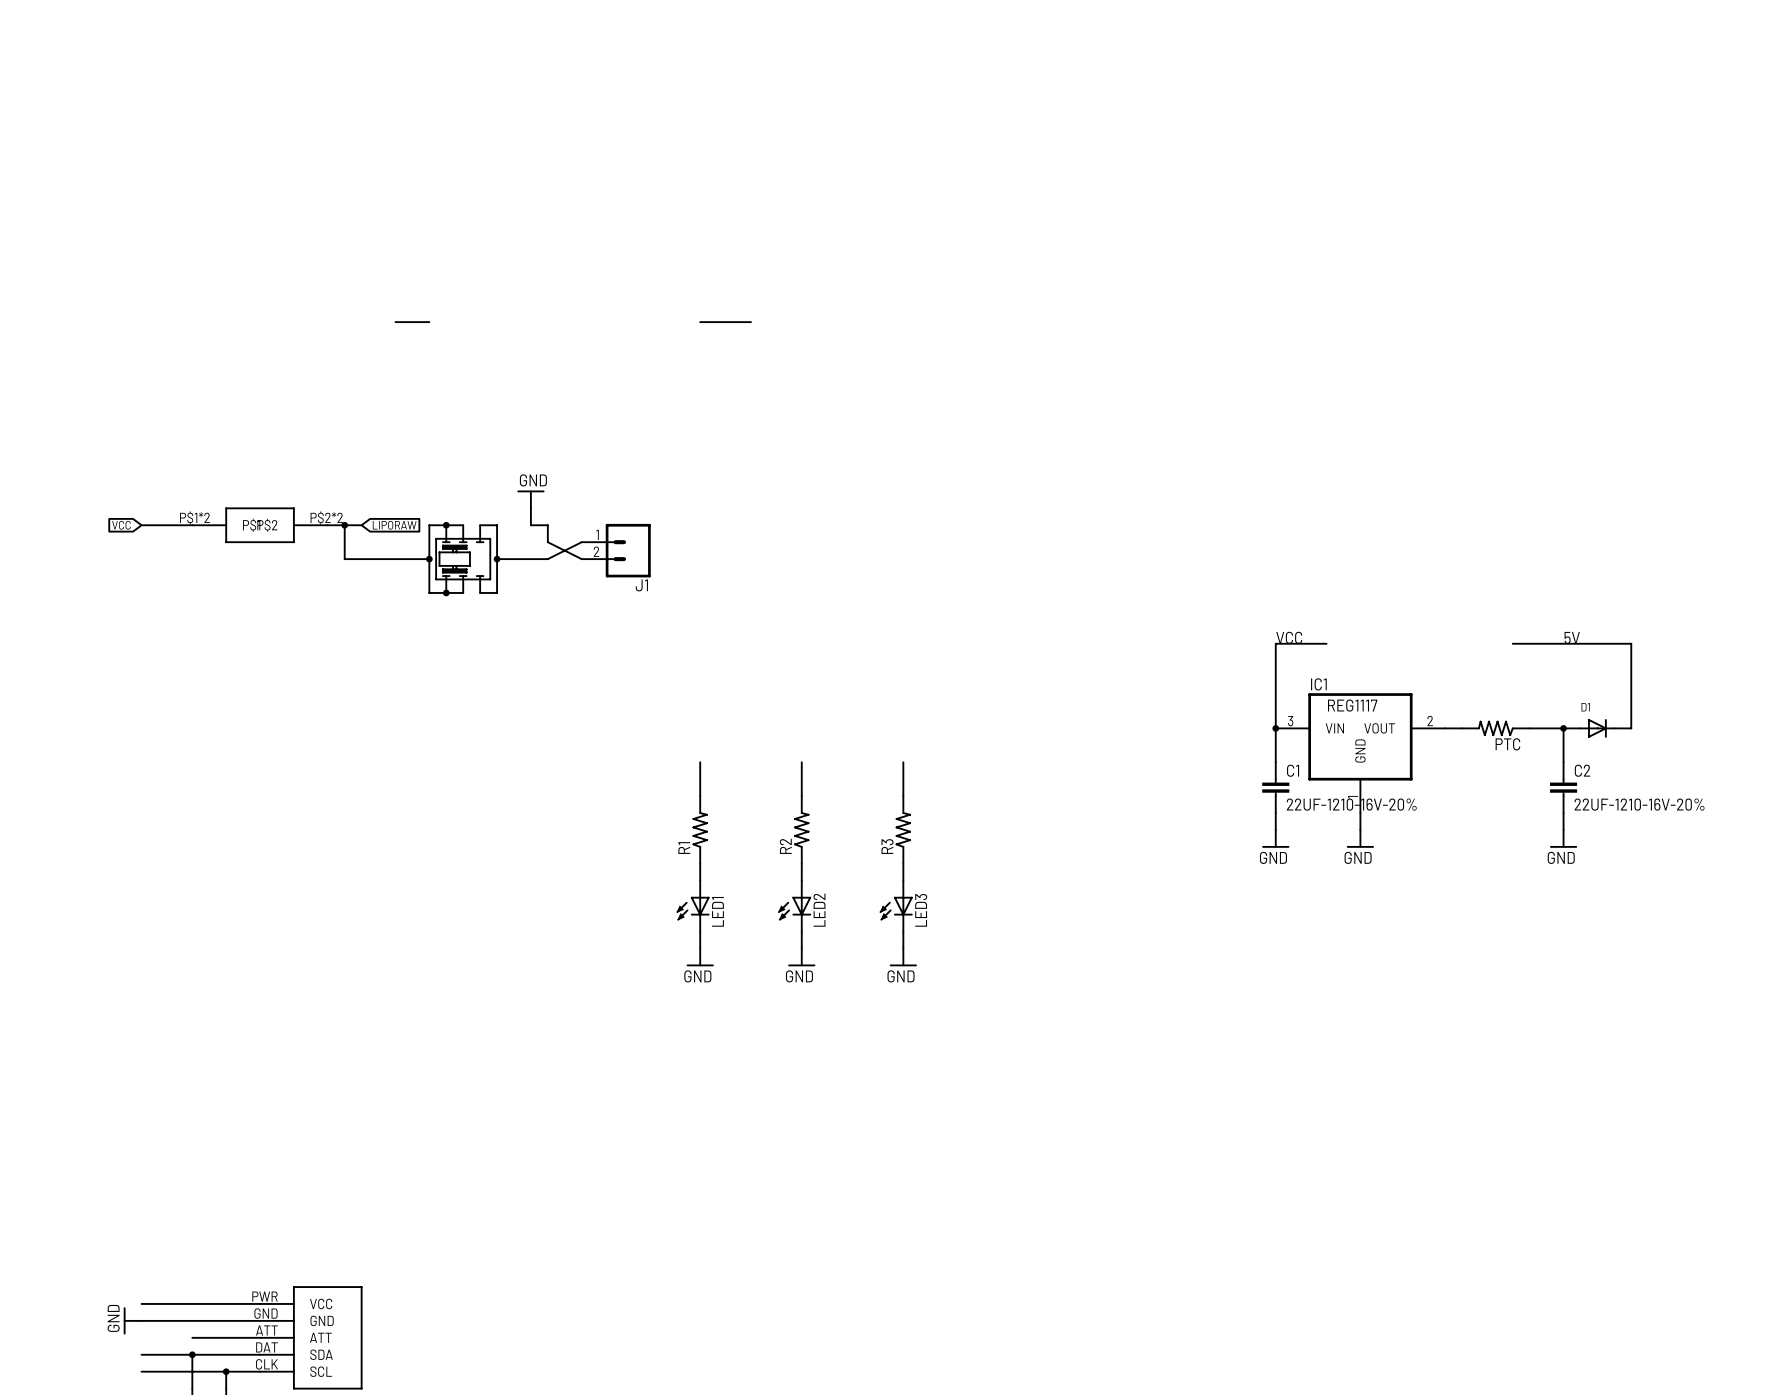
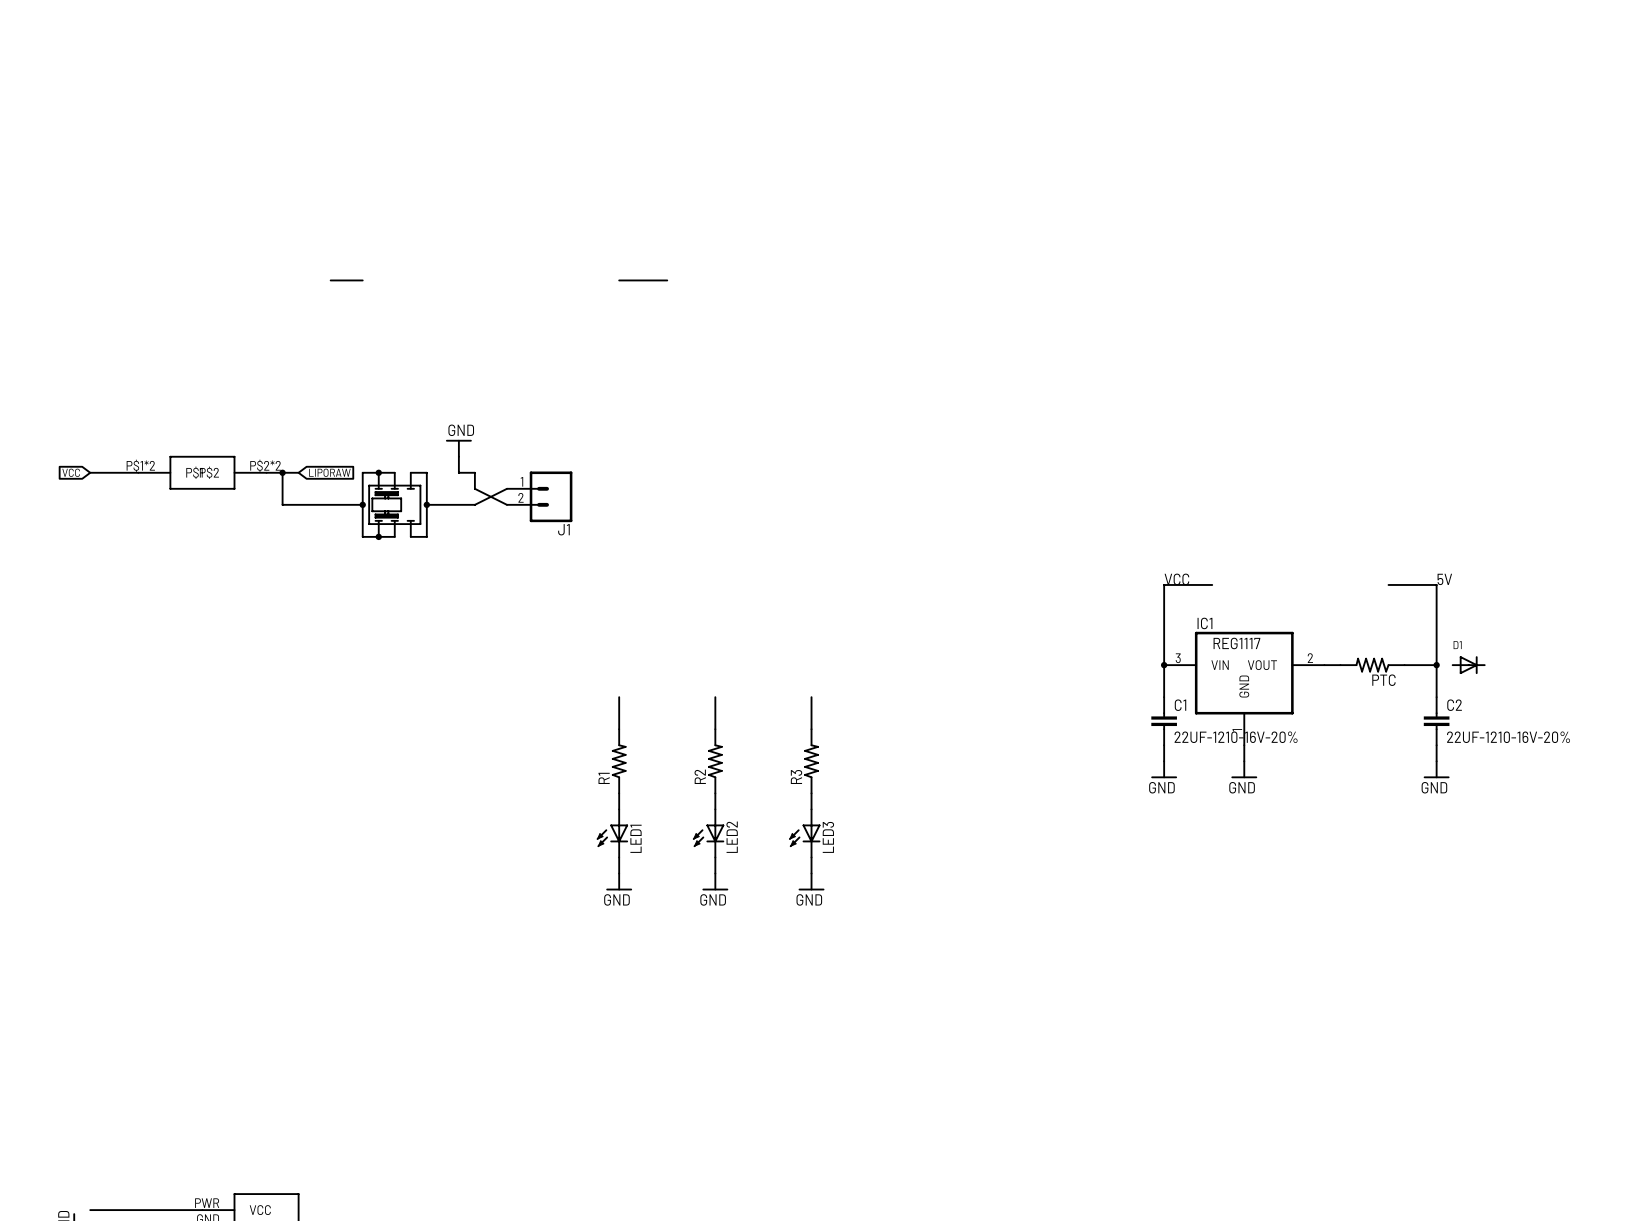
wire: (1563, 643) (1631, 643) (1631, 728) (1614, 728) -> (1436, 584) (1436, 665)
wire: (1563, 728) (1580, 728) -> none

